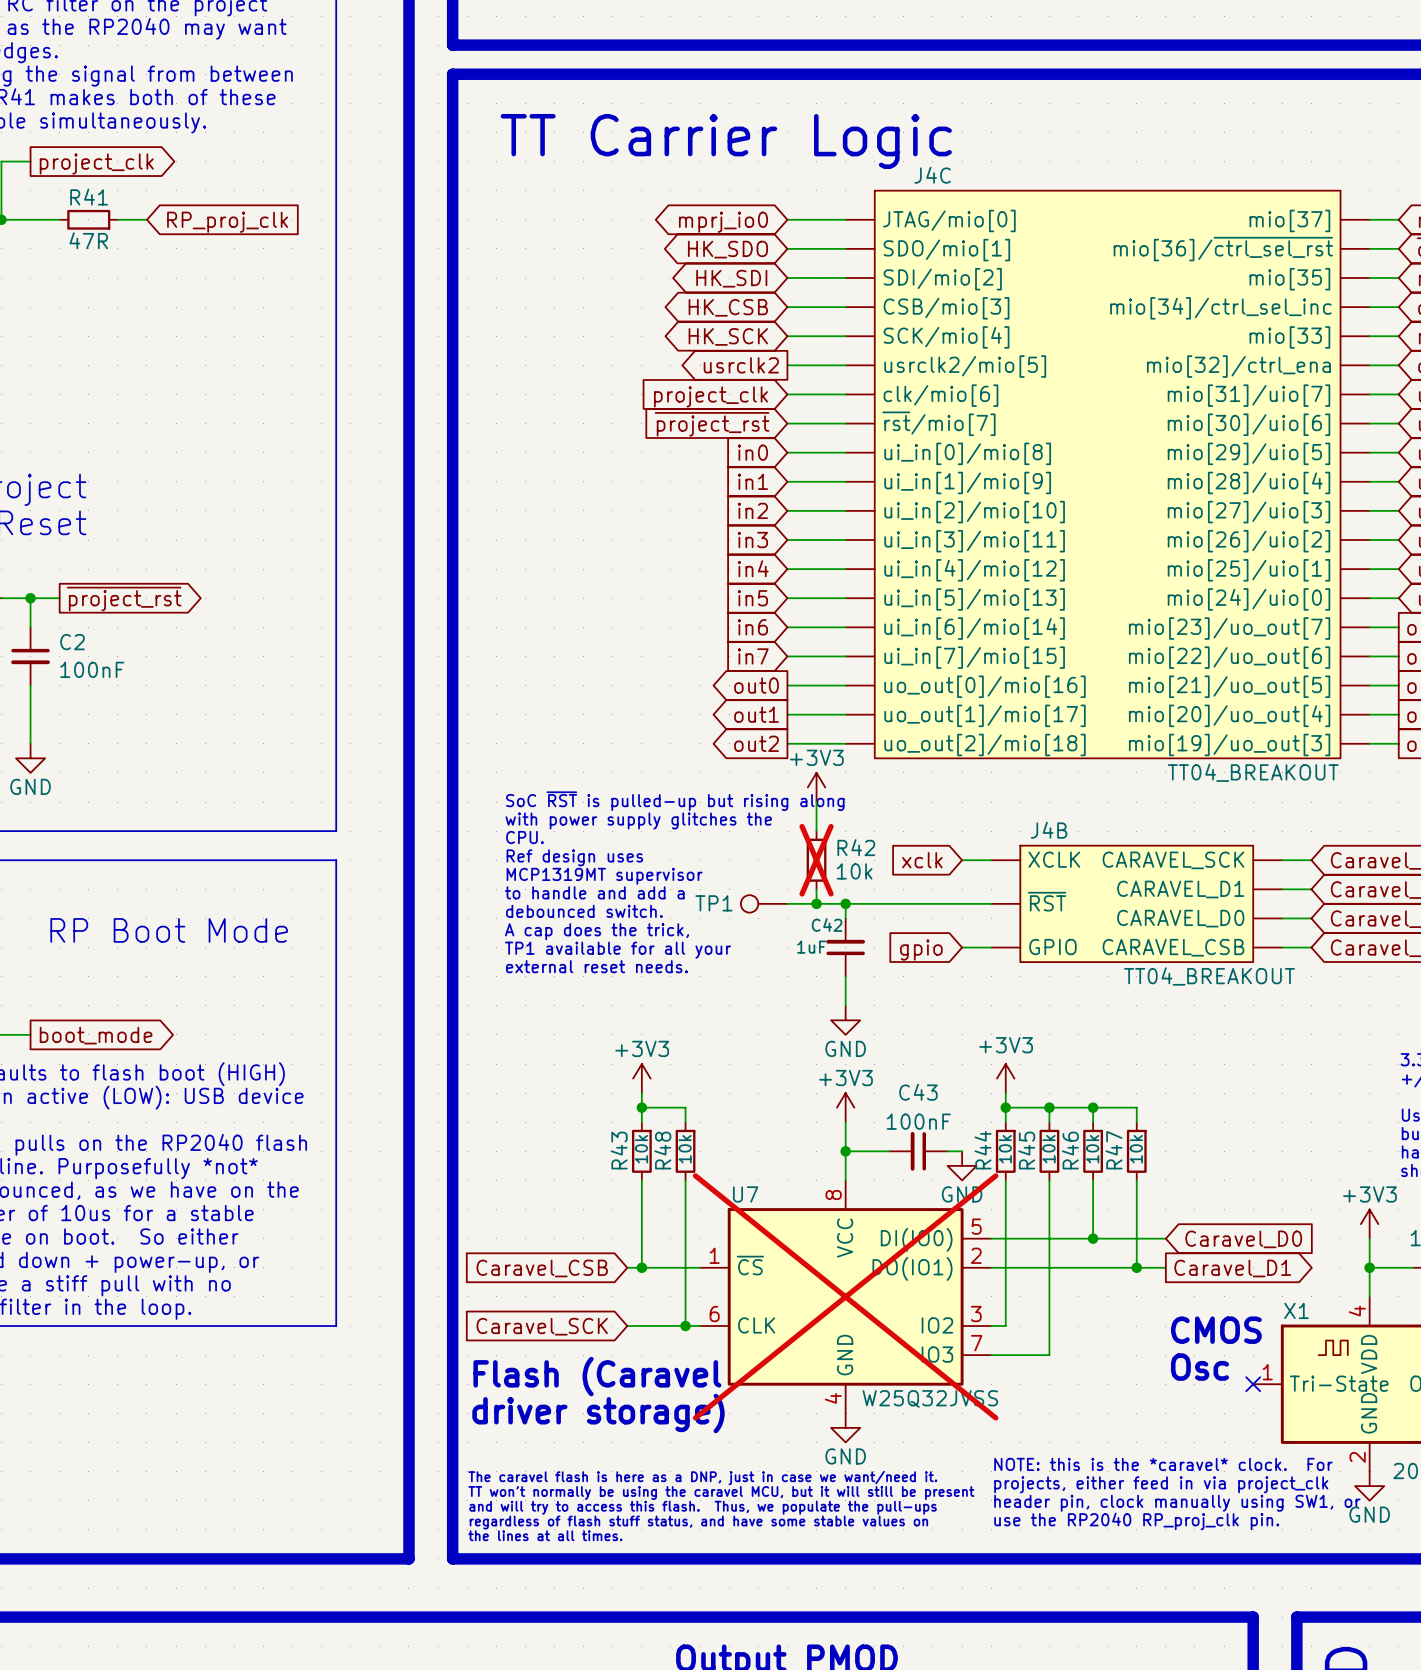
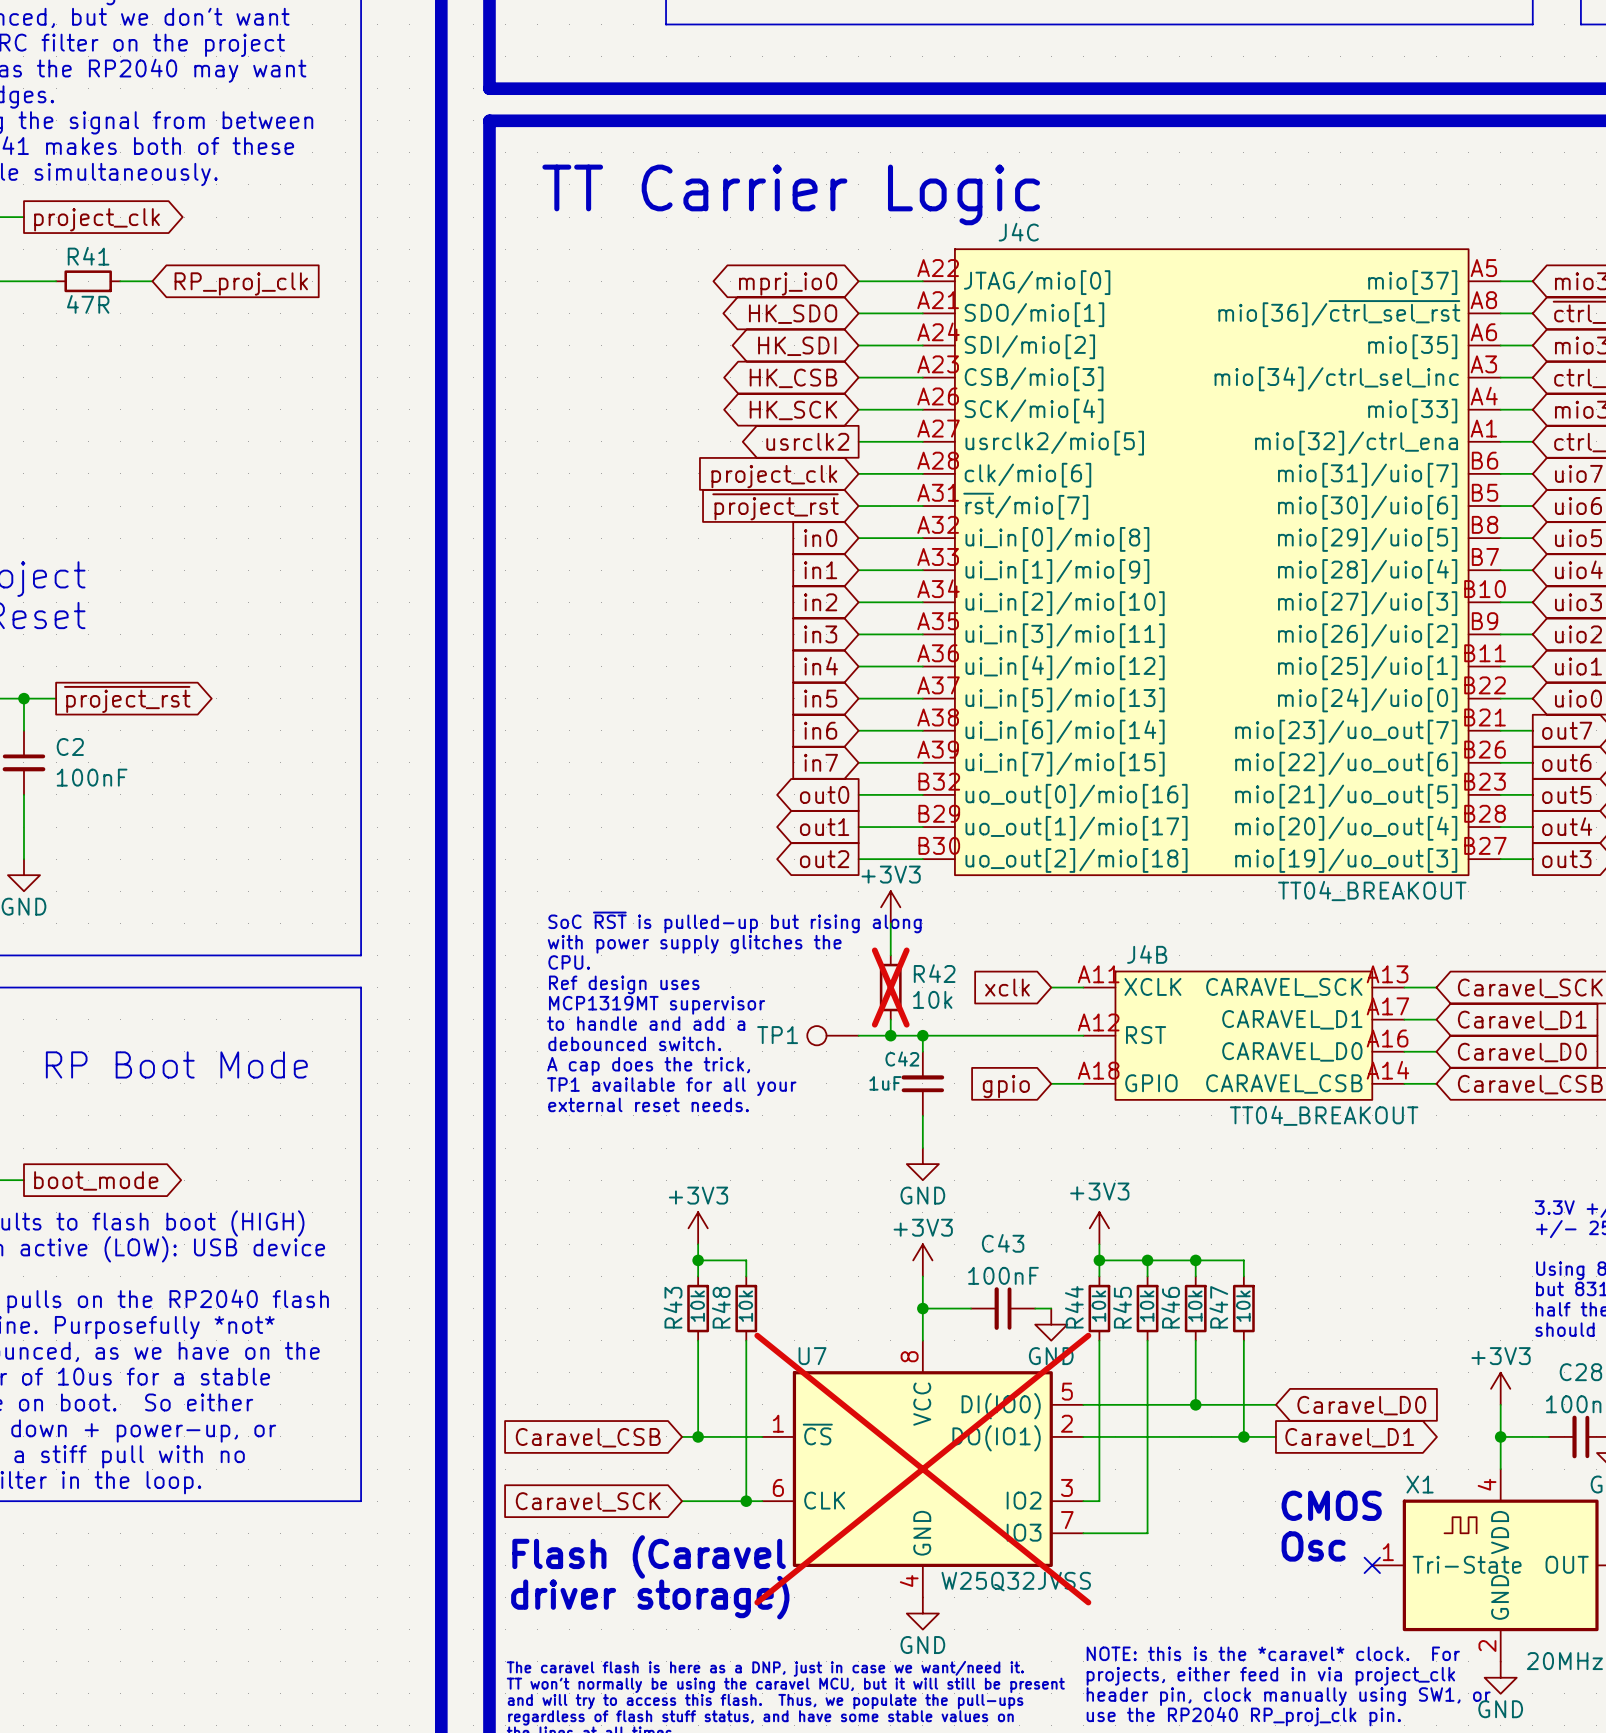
J4C symbol: [845, 190, 1370, 759] -> [922, 249, 1501, 876]
J4B pin number: none -> A11 (1098, 974)
J4B pin number: none -> A13 (1387, 974)
J4B pin number: none -> A17 (1387, 1006)
J4B pin number: none -> A12 (1098, 1022)
J4B pin name: ~{RST} (1047, 901) -> RST (1146, 1035)
J4B pin number: none -> A16 (1387, 1038)
J4B pin number: none -> A18 (1098, 1070)
J4B pin number: none -> A14 (1387, 1070)

